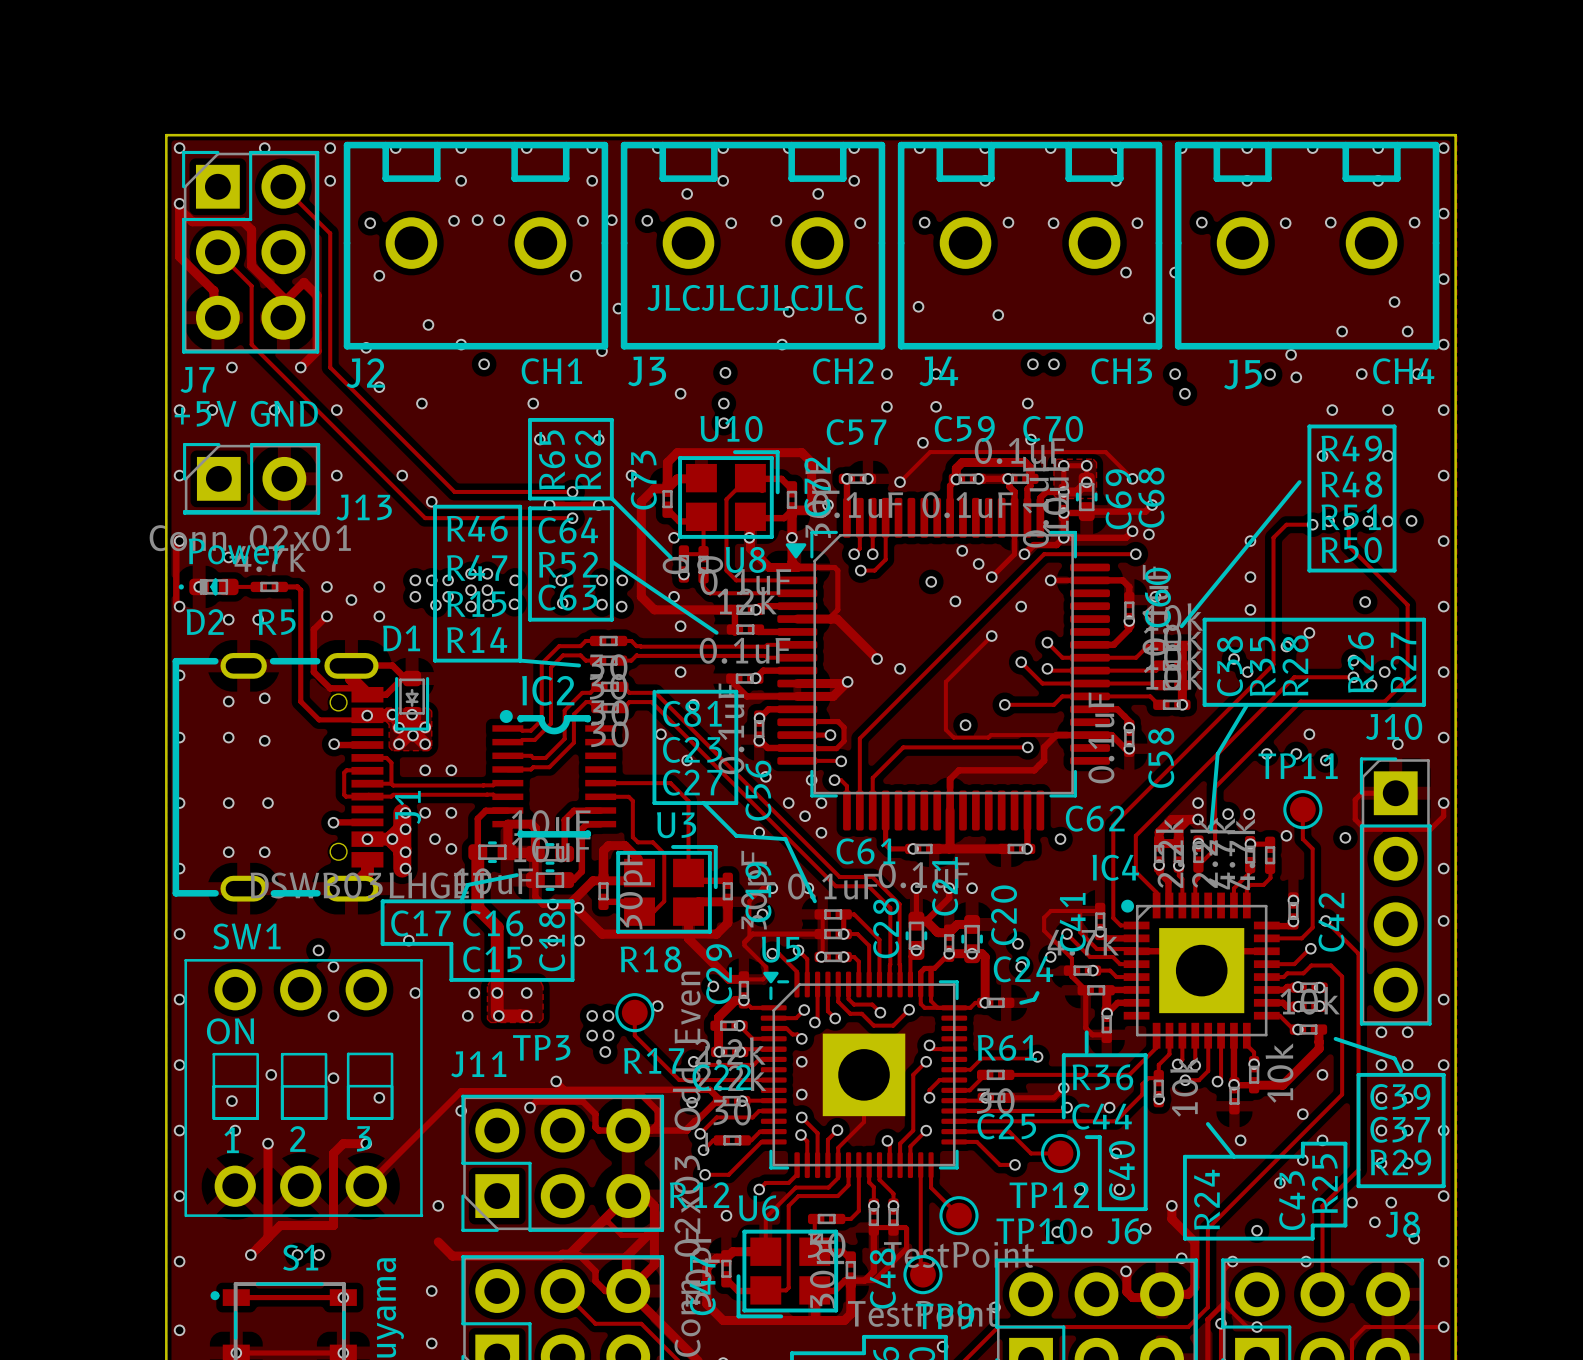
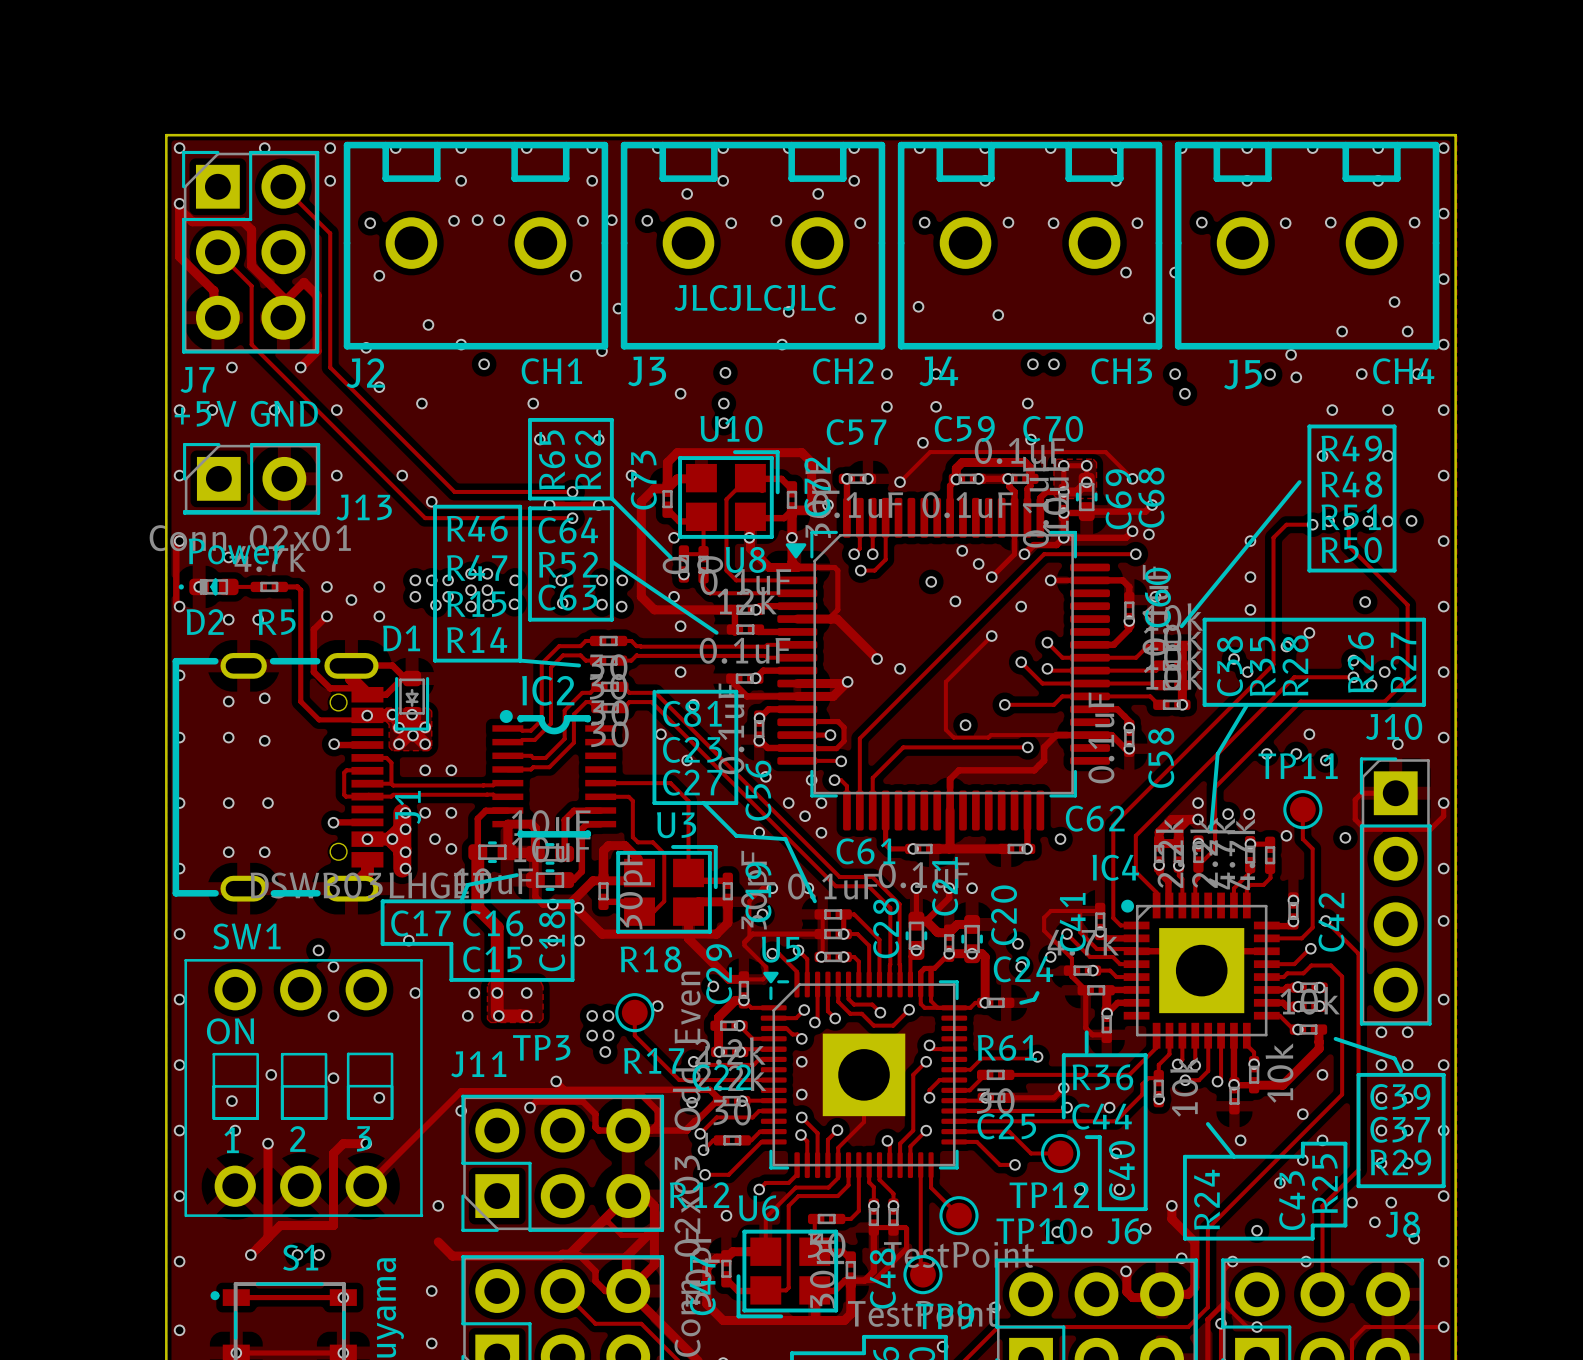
text: JLCJLCJLCJLC (755, 297) -> JLCJLCJLC (755, 297)

